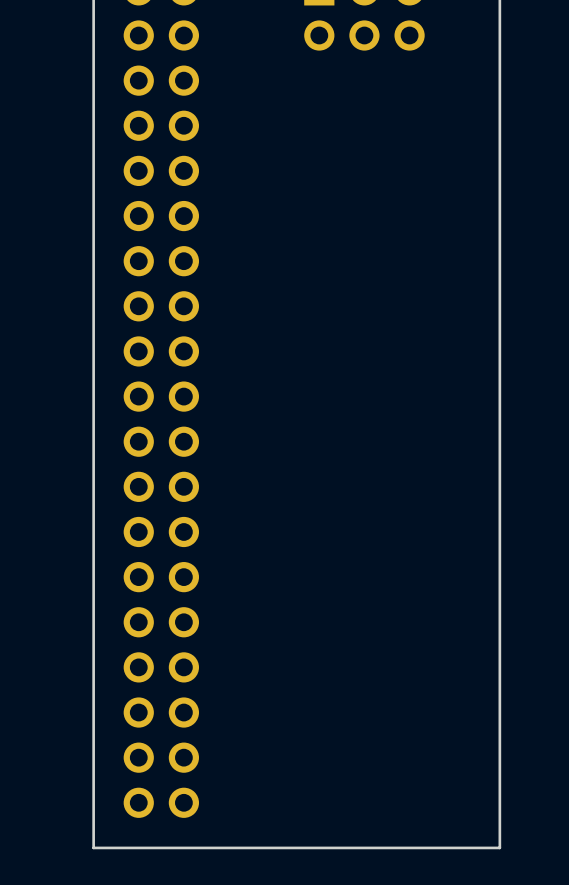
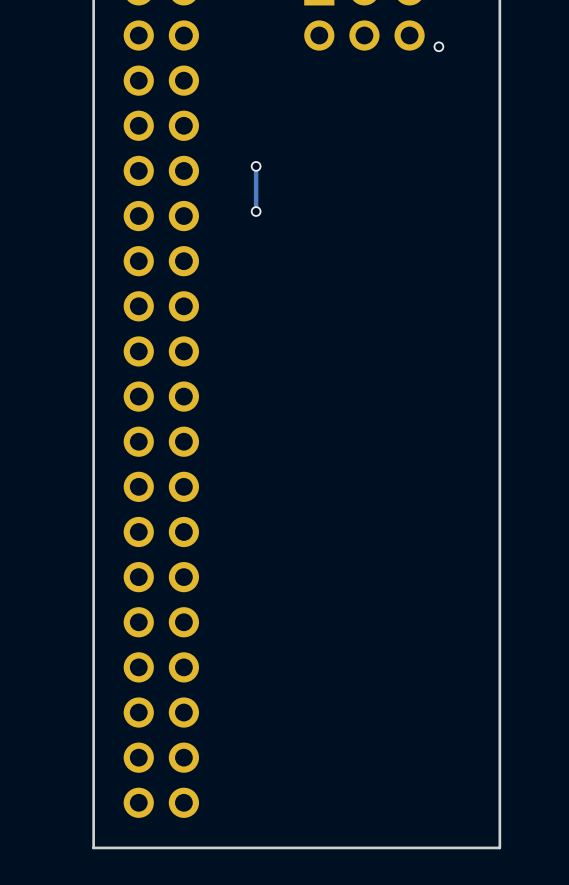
via: none -> (438, 46)
track: none -> (256, 166) (256, 211)
via: none -> (256, 166)
via: none -> (256, 211)

